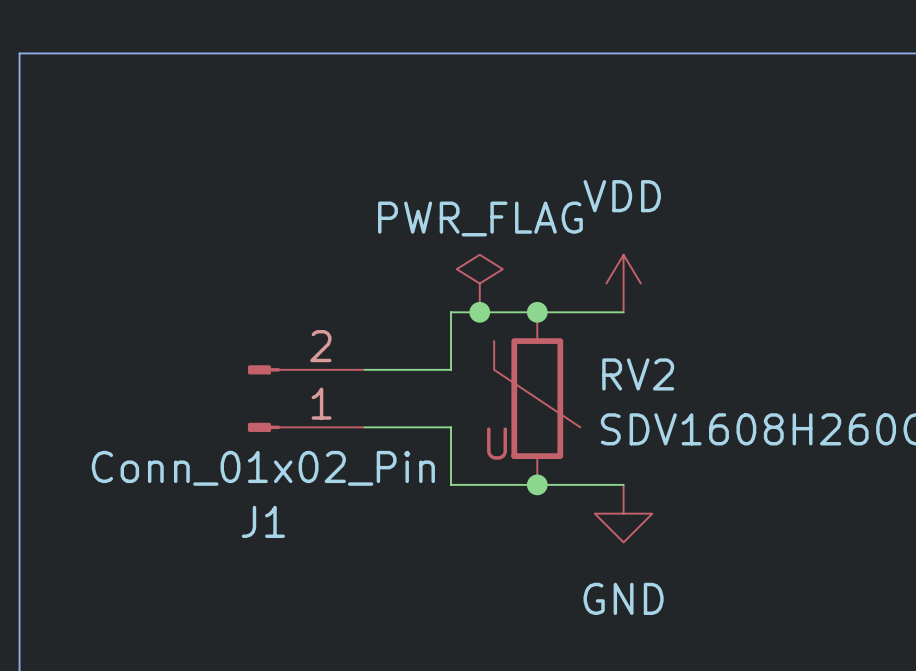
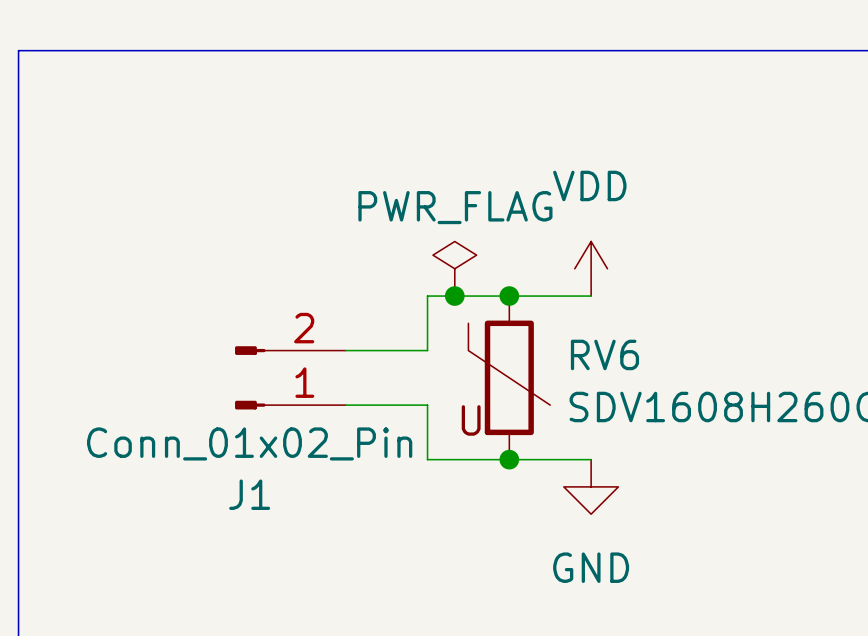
RV2 name: RV2 (638, 374) -> RV6 (604, 354)

